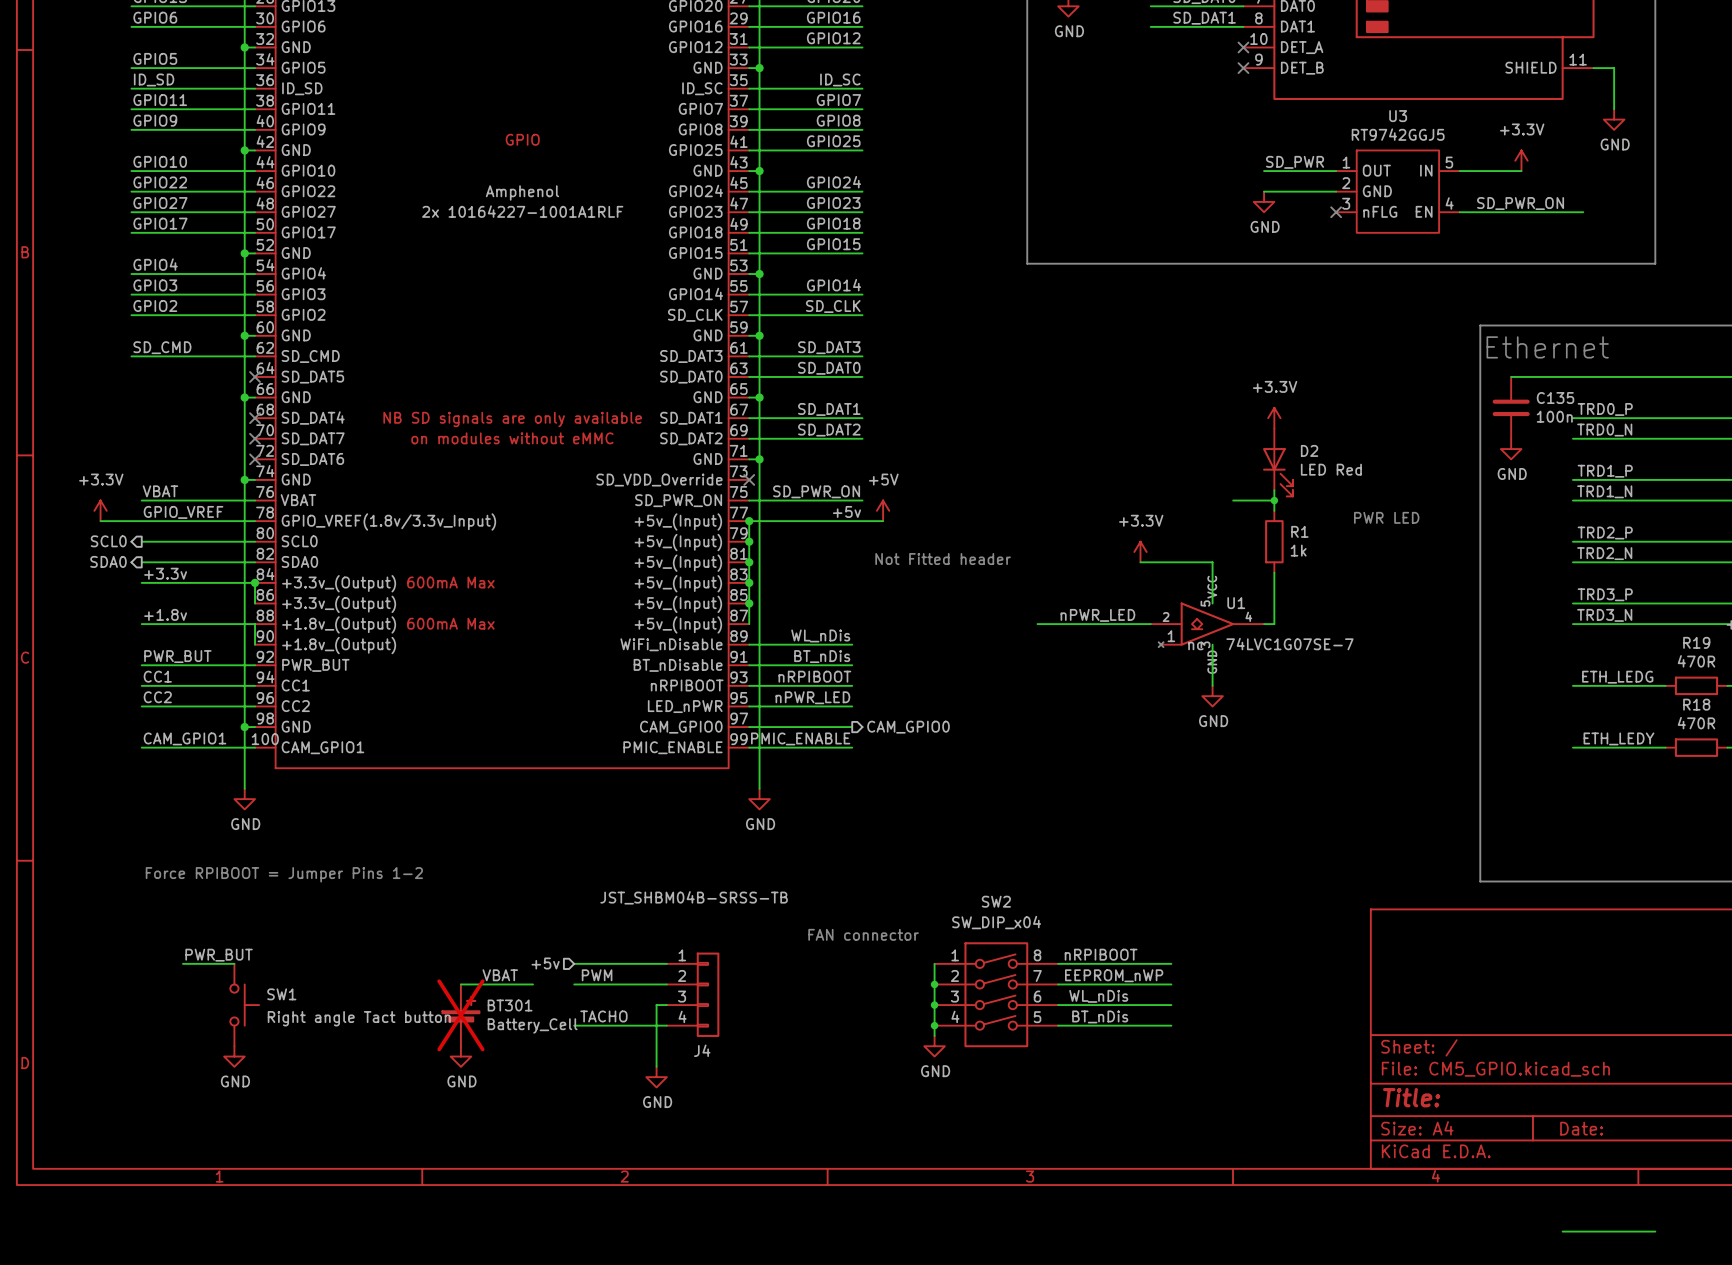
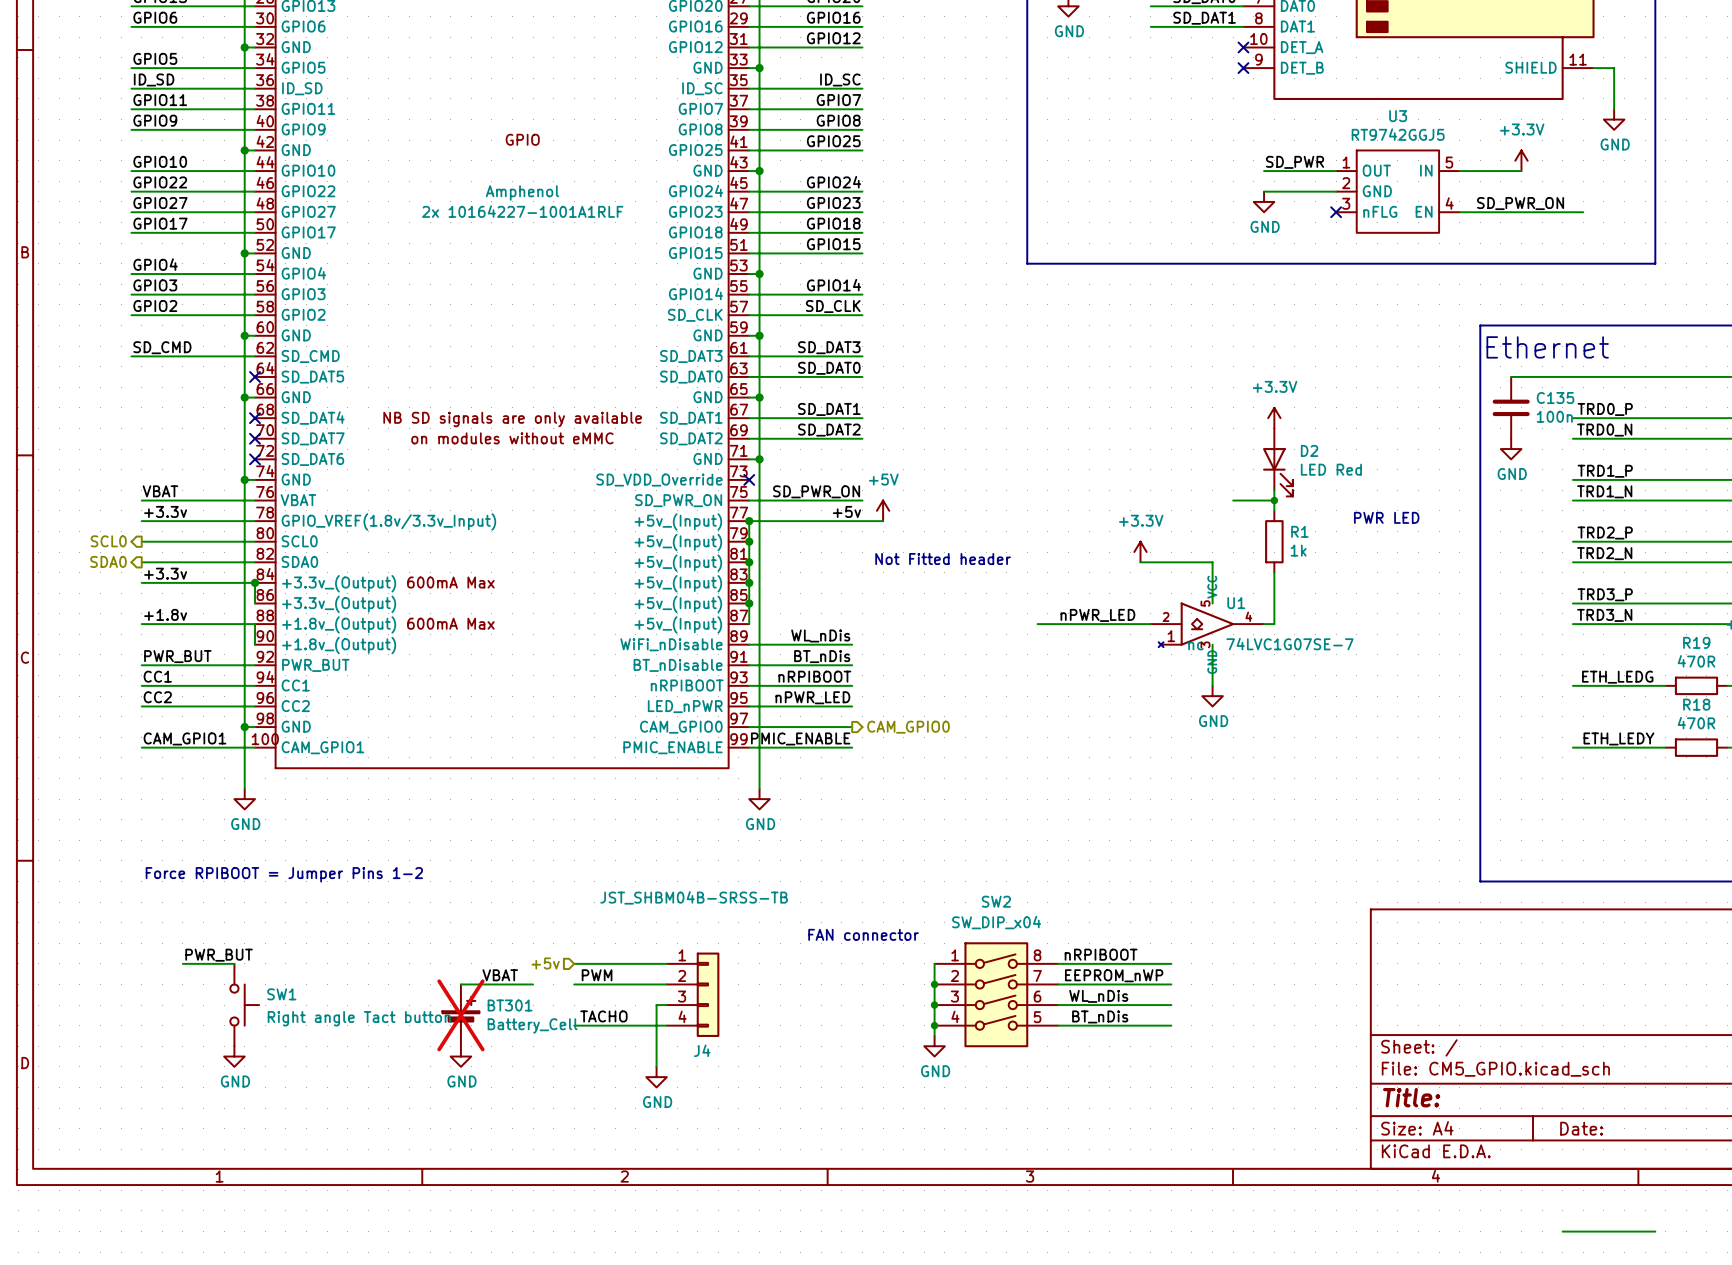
power symbol: +3.3V (100, 510) -> none
label: GPIO_VREF (183, 512) -> +3.3v (165, 511)
wire: (100, 521) (141, 521) -> none

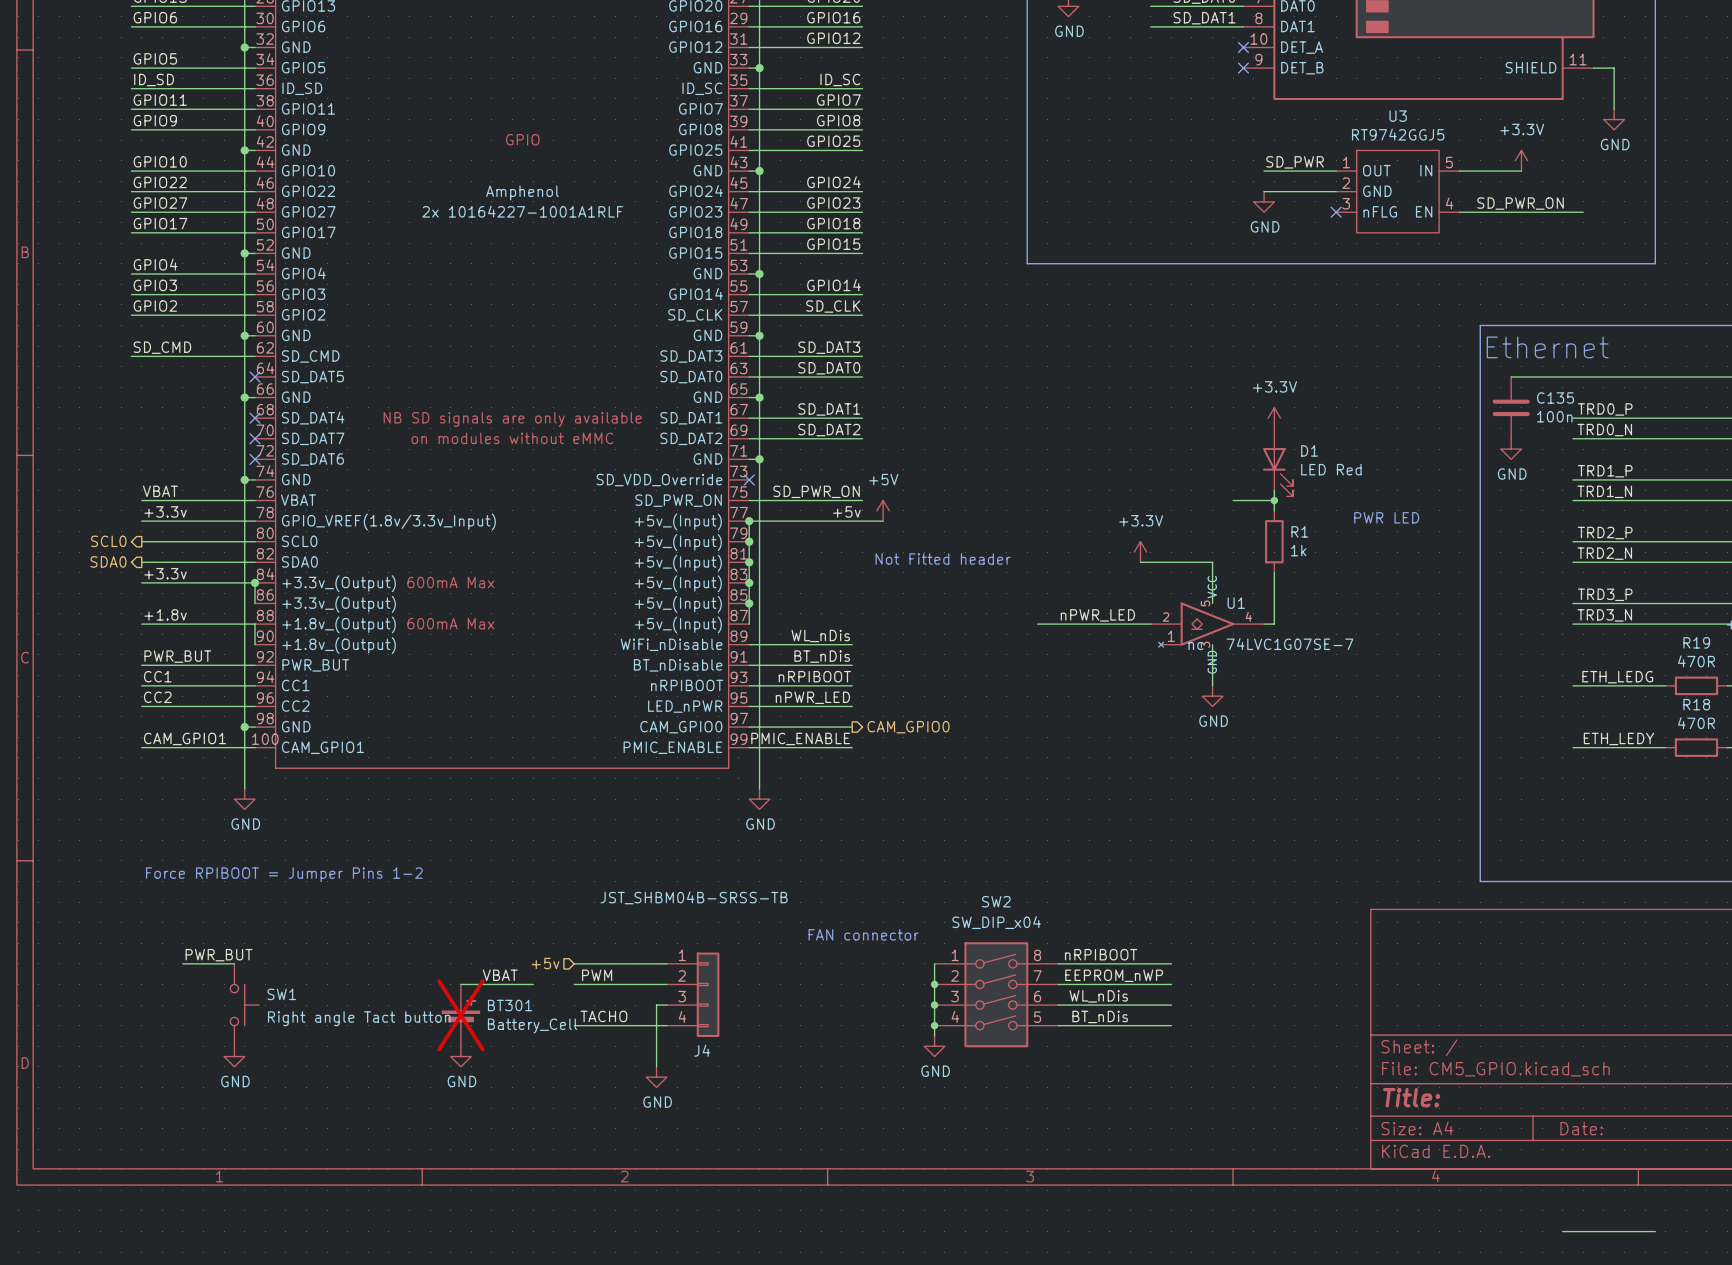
D2 name: D2 (1309, 450) -> D1 (1309, 450)

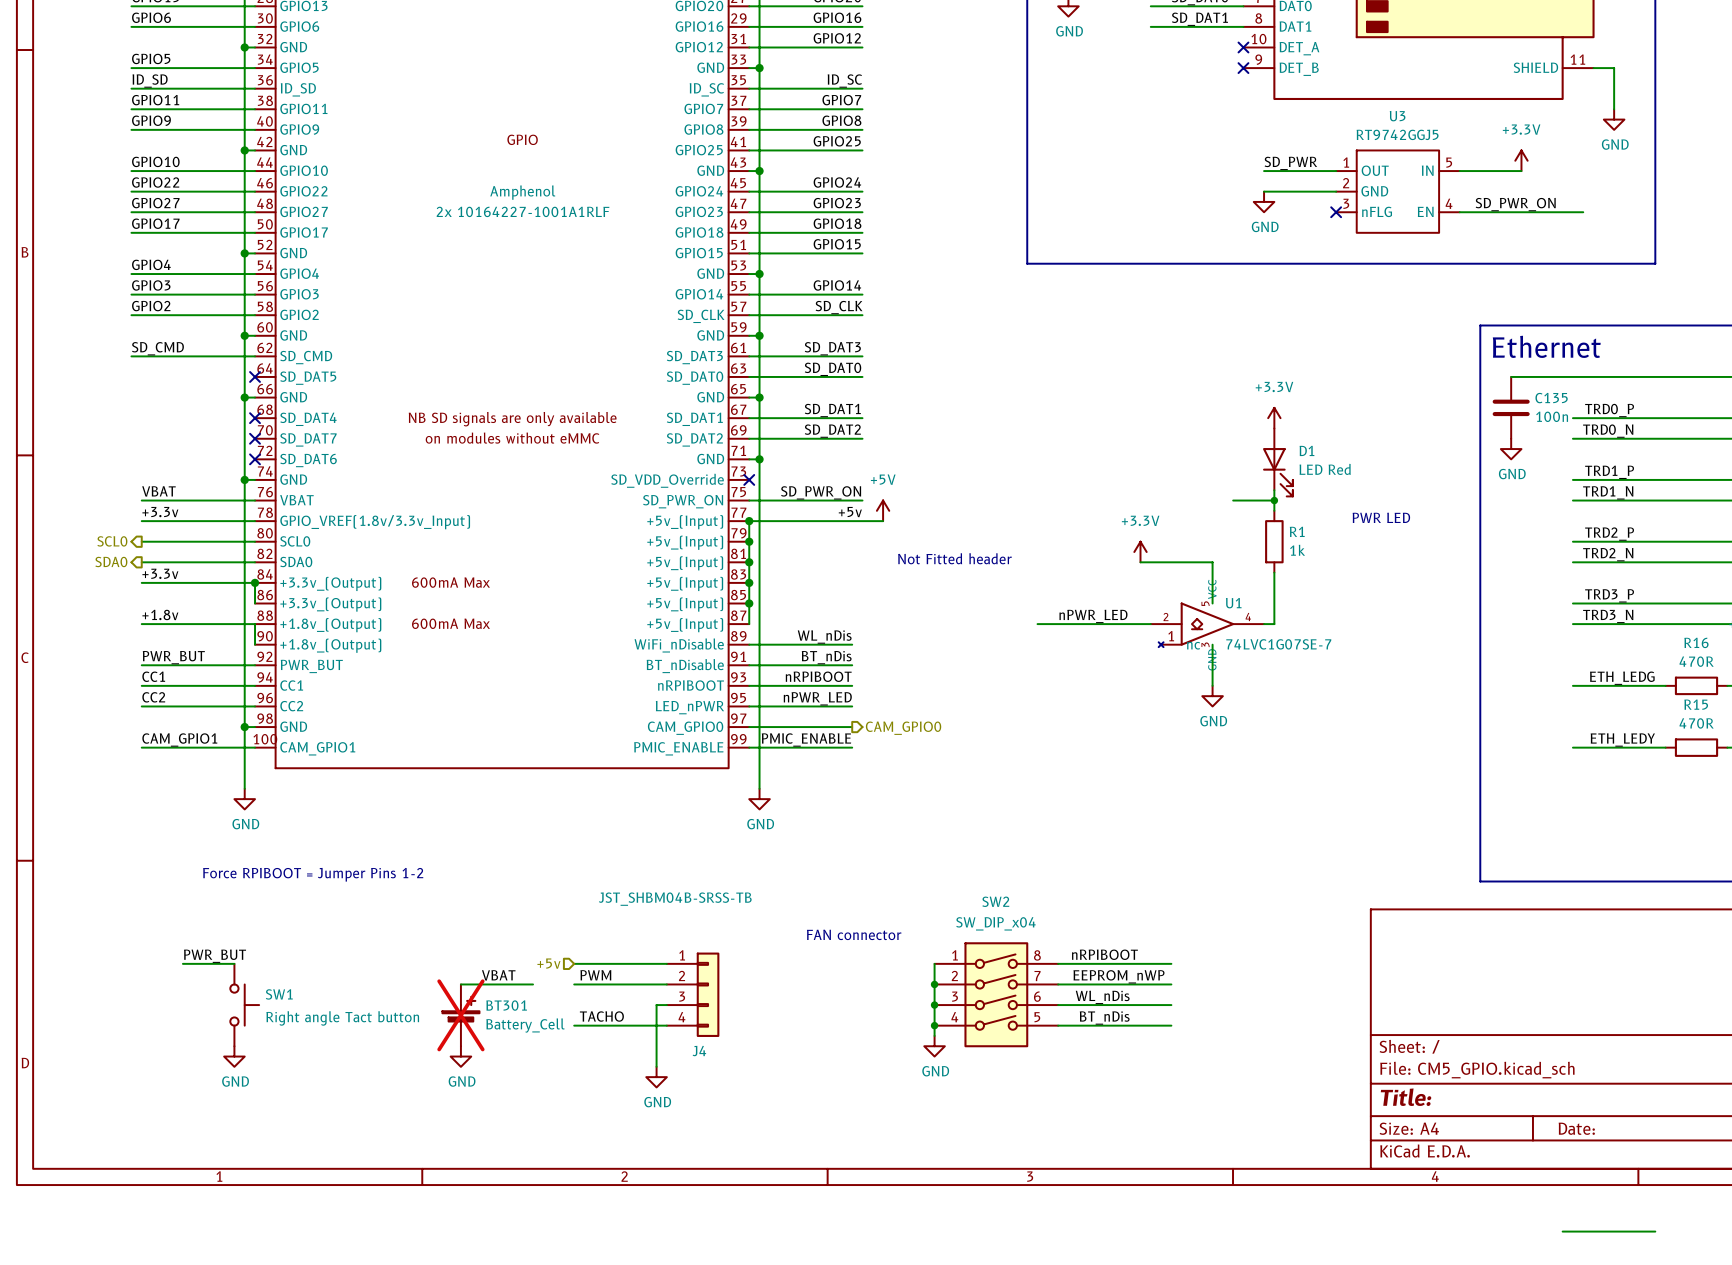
R19 name: R19 (1696, 642) -> R16 (1696, 642)
R18 name: R18 (1696, 704) -> R15 (1696, 704)

